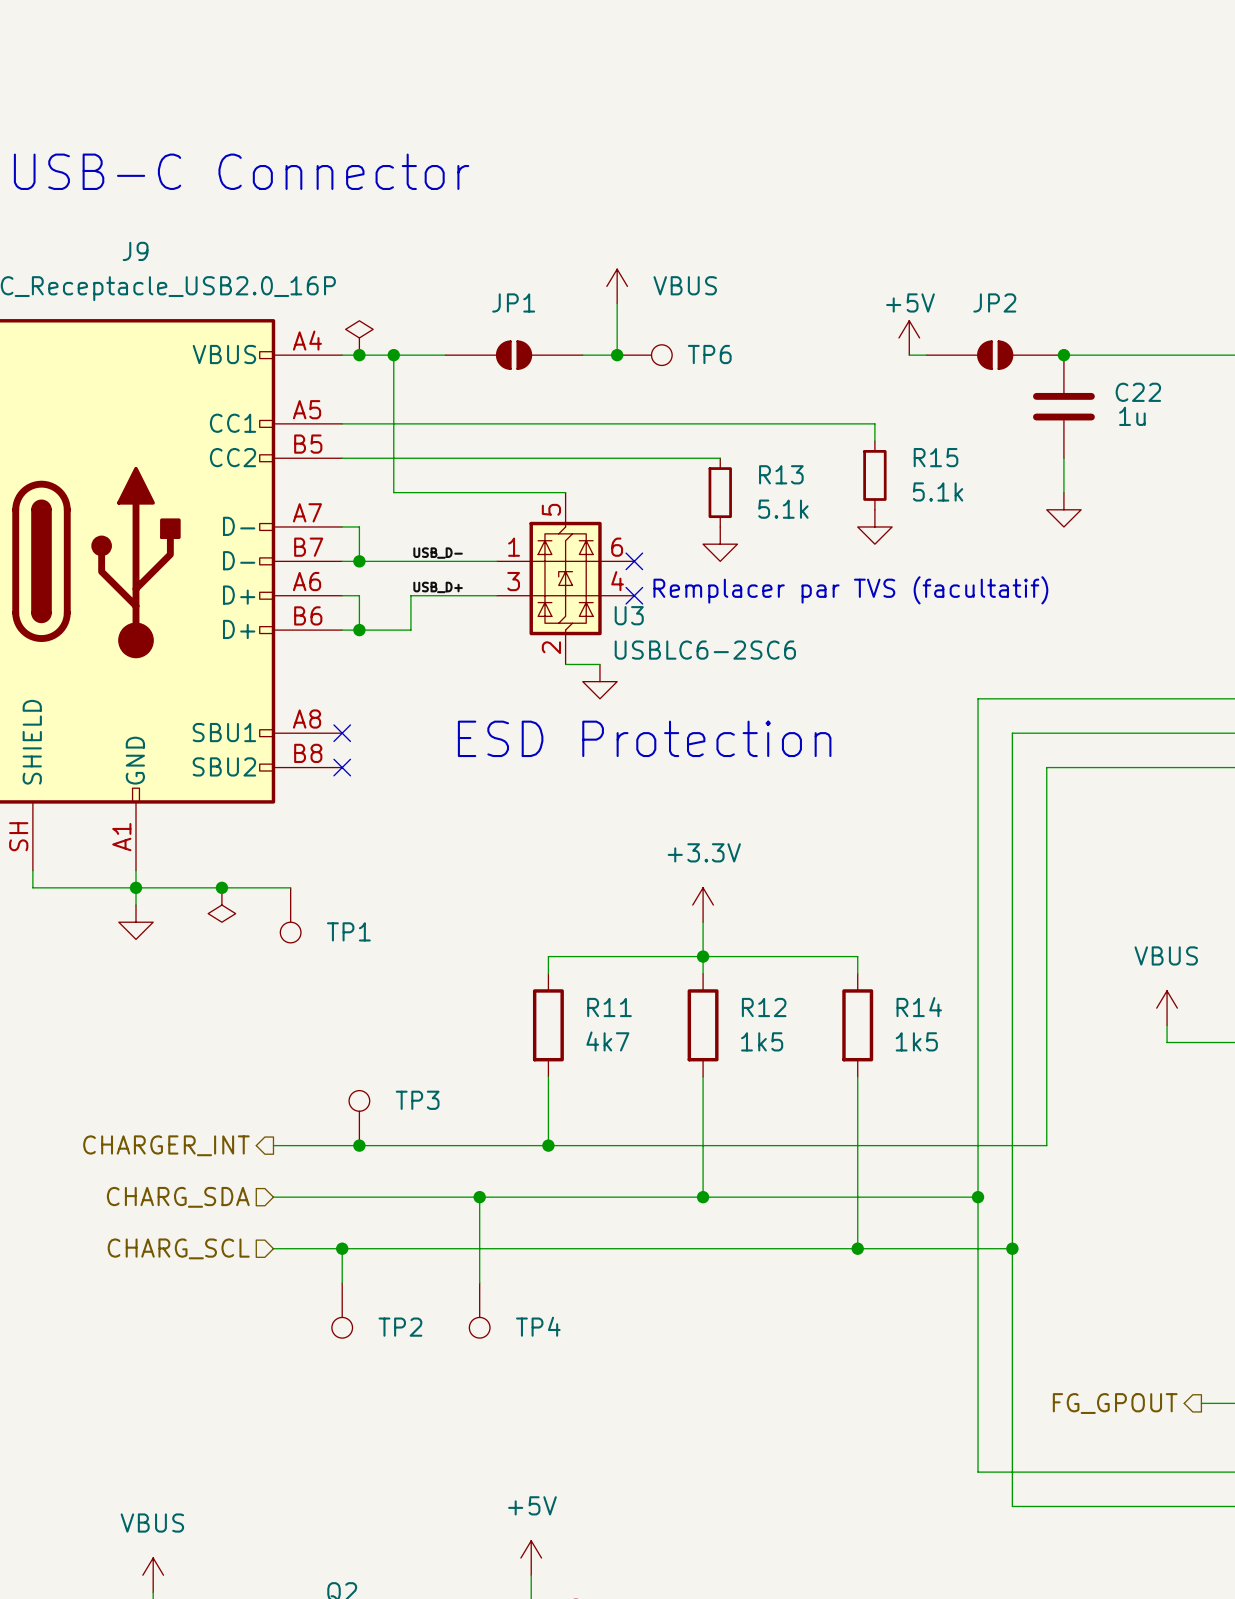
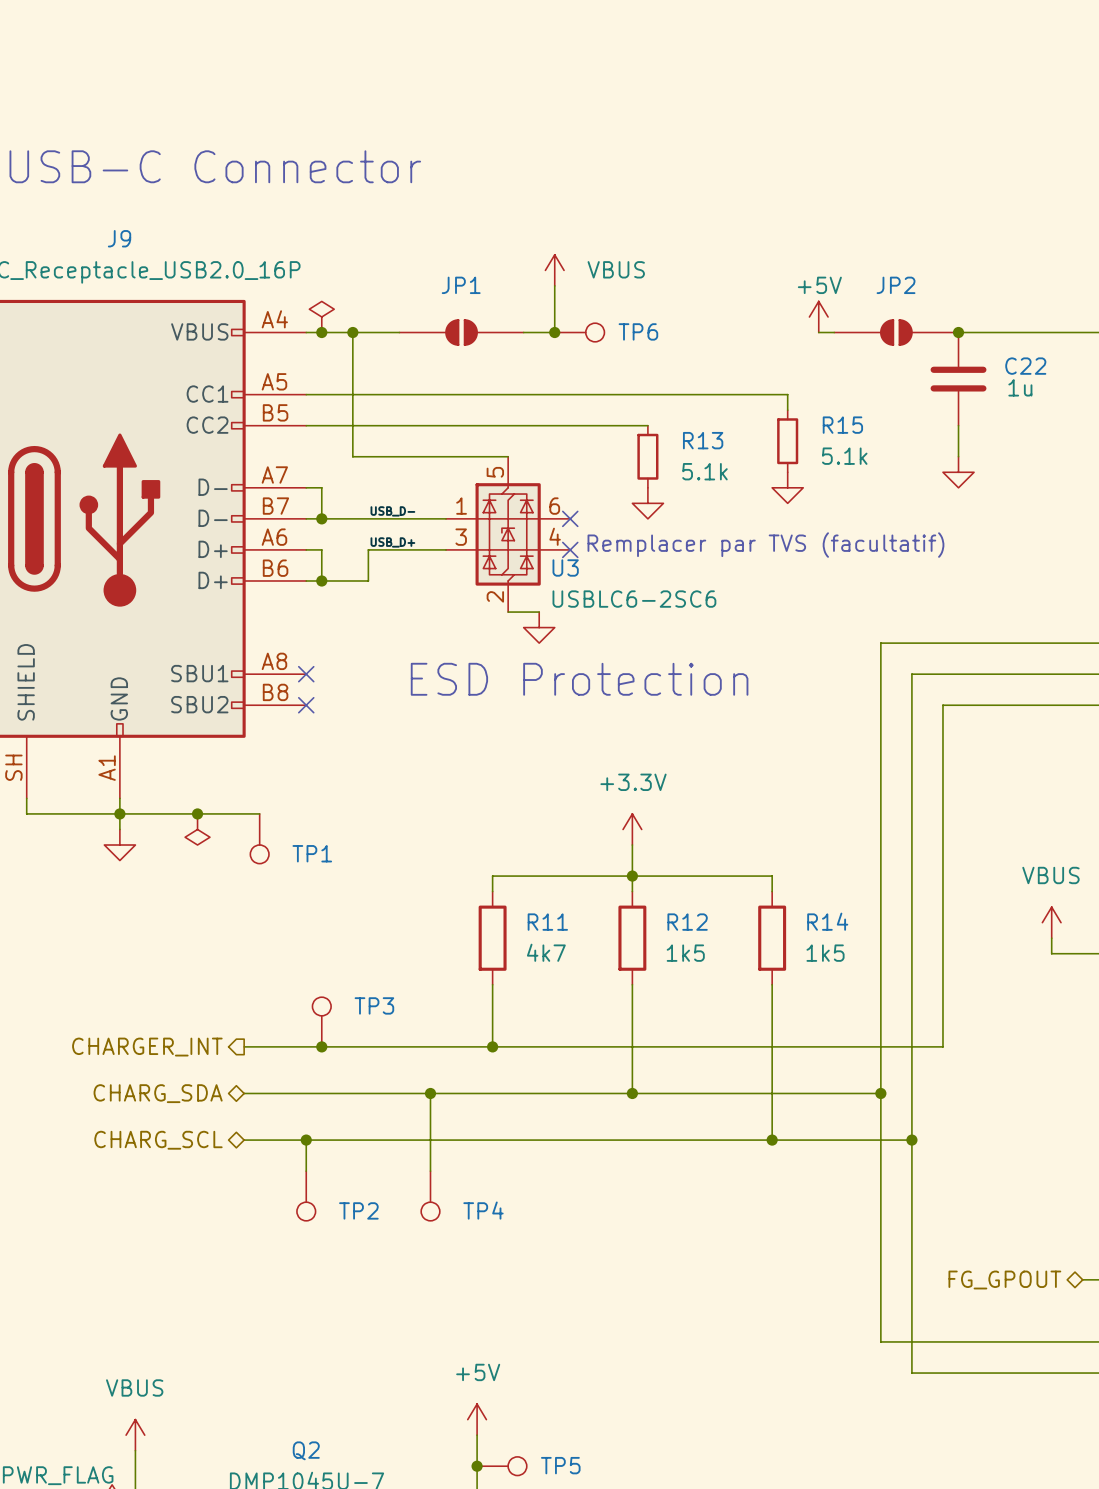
hierarchical label shape: input (178, 1197) -> bidirectional (158, 1093)
hierarchical label shape: input (178, 1248) -> bidirectional (158, 1140)
hierarchical label shape: output (1115, 1403) -> bidirectional (1004, 1280)

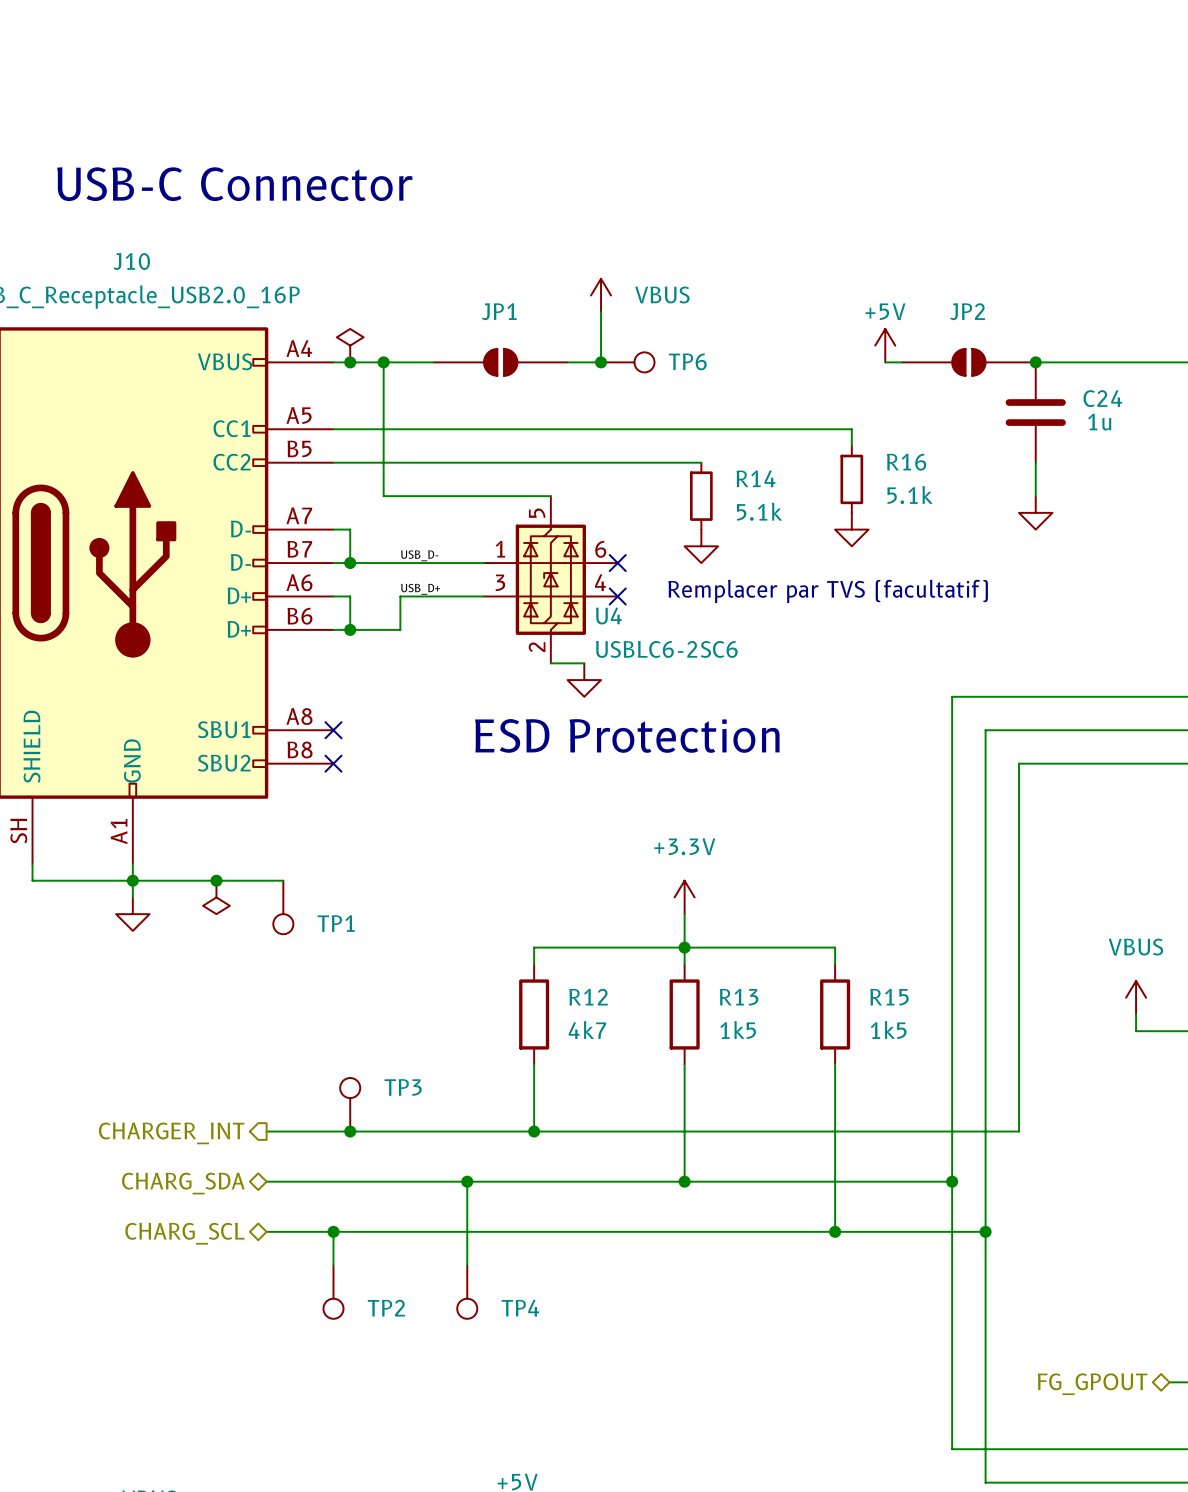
J9 name: J9 (119, 238) -> J10 (131, 261)
C22 name: C22 (1025, 366) -> C24 (1102, 398)
R15 name: R15 (842, 425) -> R16 (906, 462)
R13 name: R13 (703, 440) -> R14 (755, 478)
U3 name: U3 (565, 567) -> U4 (608, 616)
R14 name: R14 (827, 921) -> R15 (889, 997)
R11 name: R11 (547, 922) -> R12 (588, 997)
R12 name: R12 (687, 922) -> R13 (739, 997)

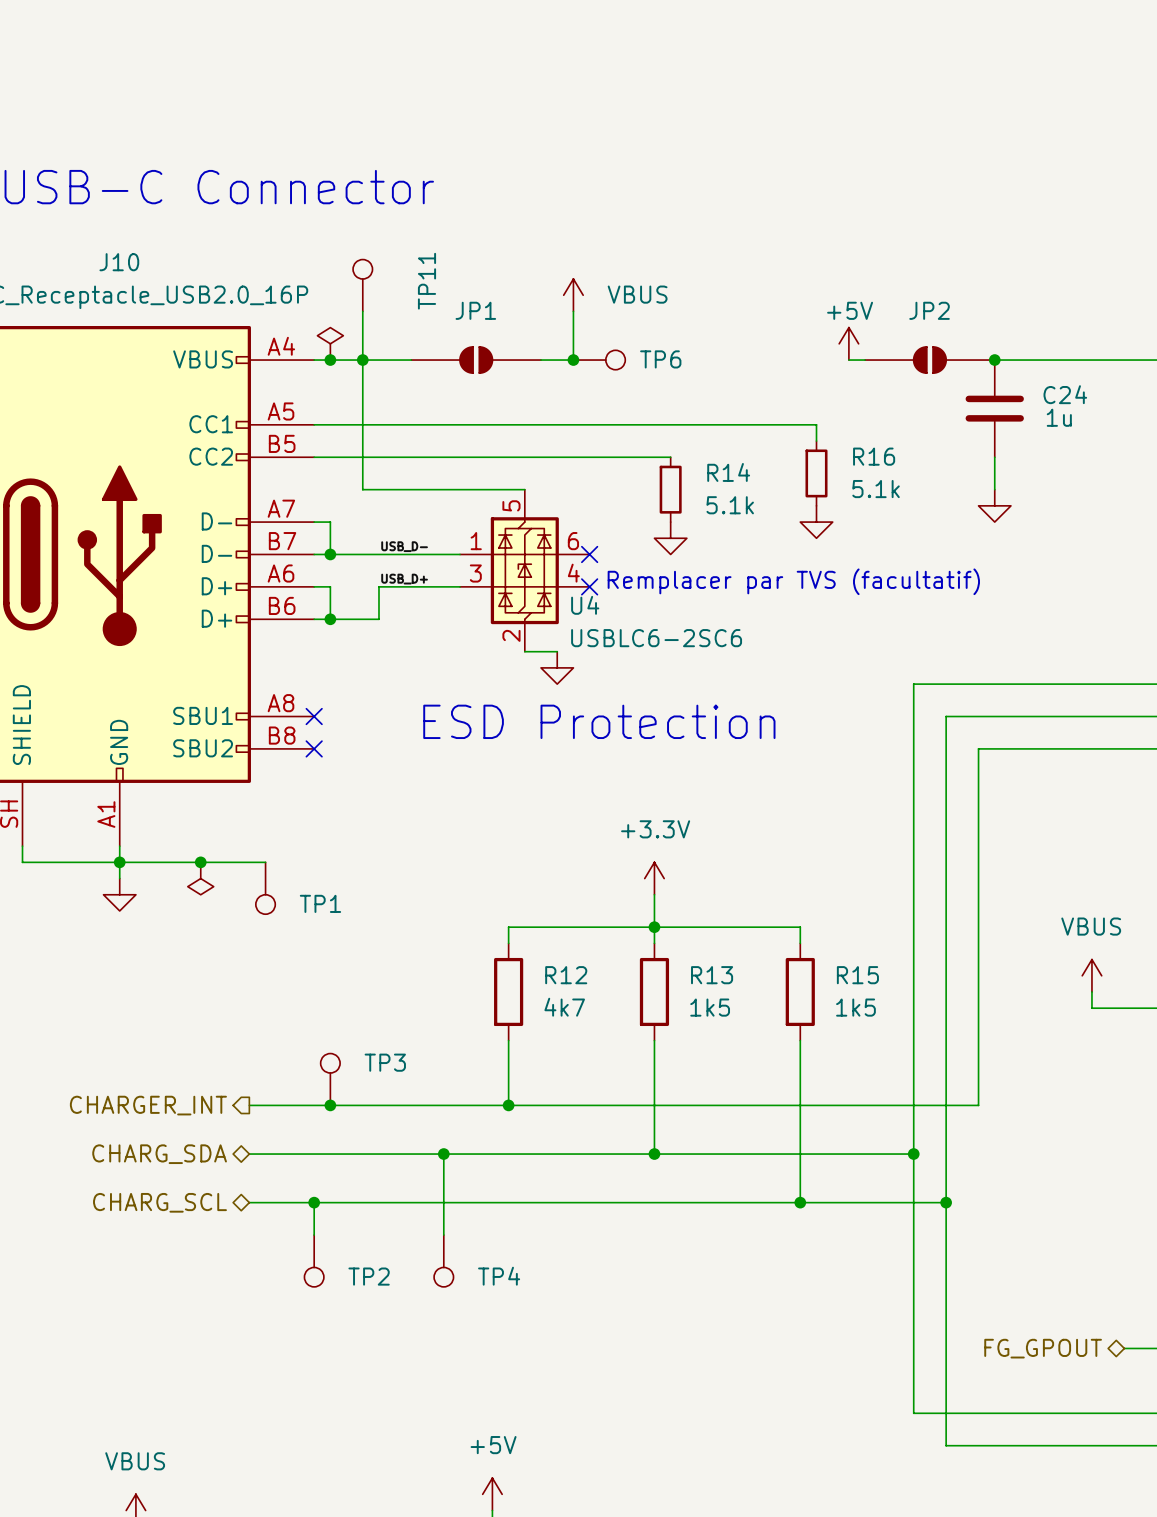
TP11: none -> (362, 285)
wire: none -> (362, 311) (362, 360)

